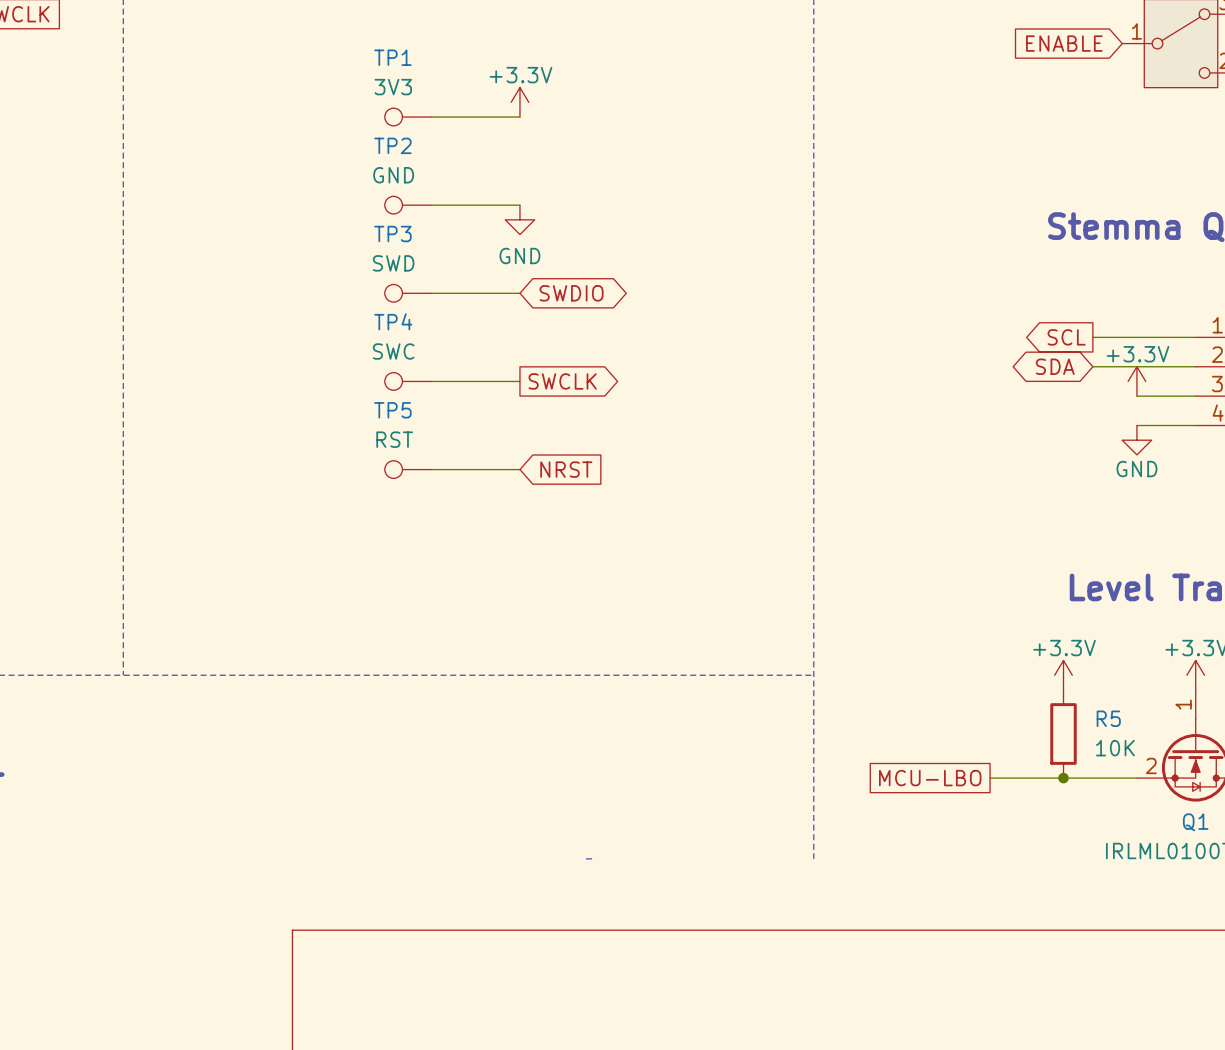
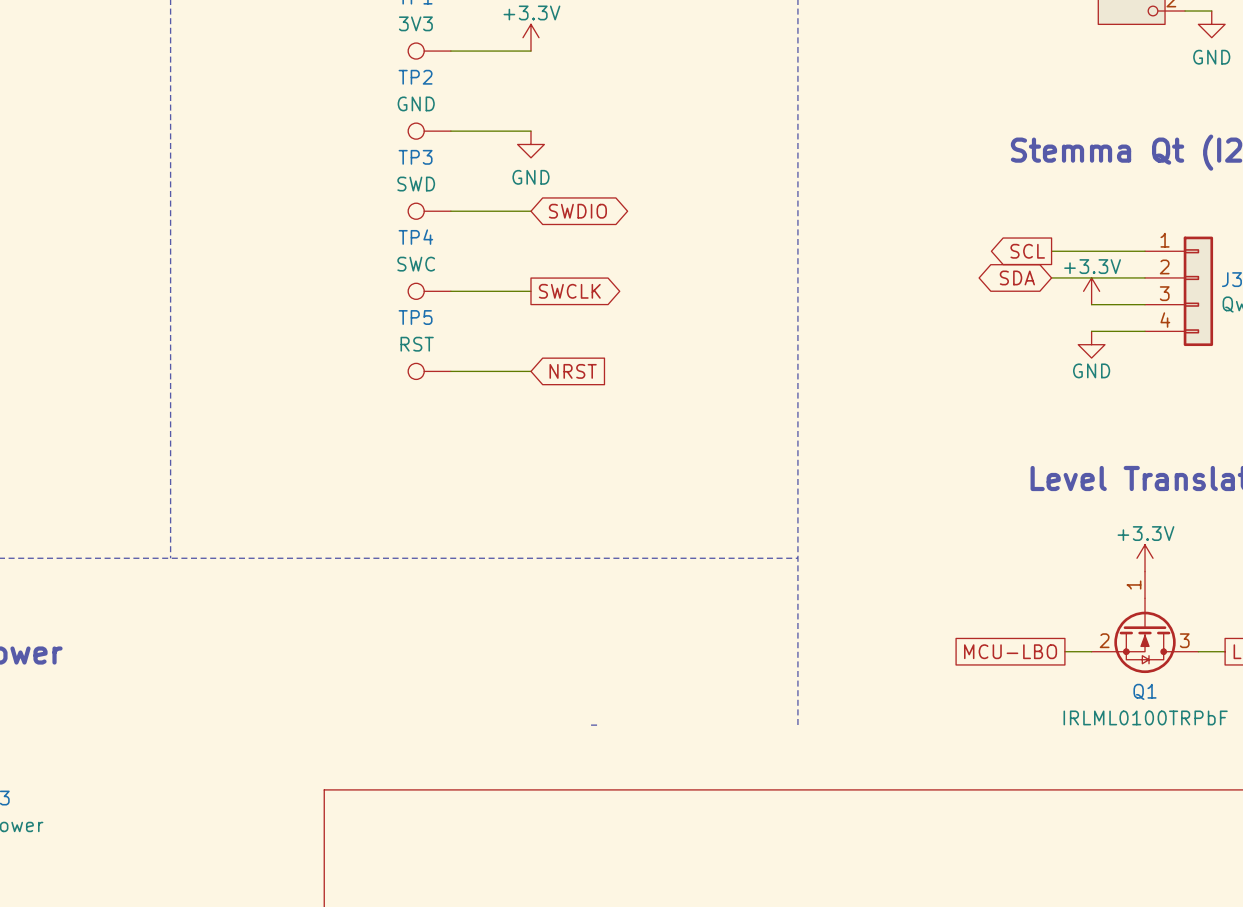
power symbol: +3.3V (1063, 675) -> none
R5: 10K (1063, 734) -> none
global label position: MCU-LBO (930, 778) -> MCU-LBO (1010, 651)
wire: (990, 778) (1107, 778) -> none
junction: (1063, 778) -> none

